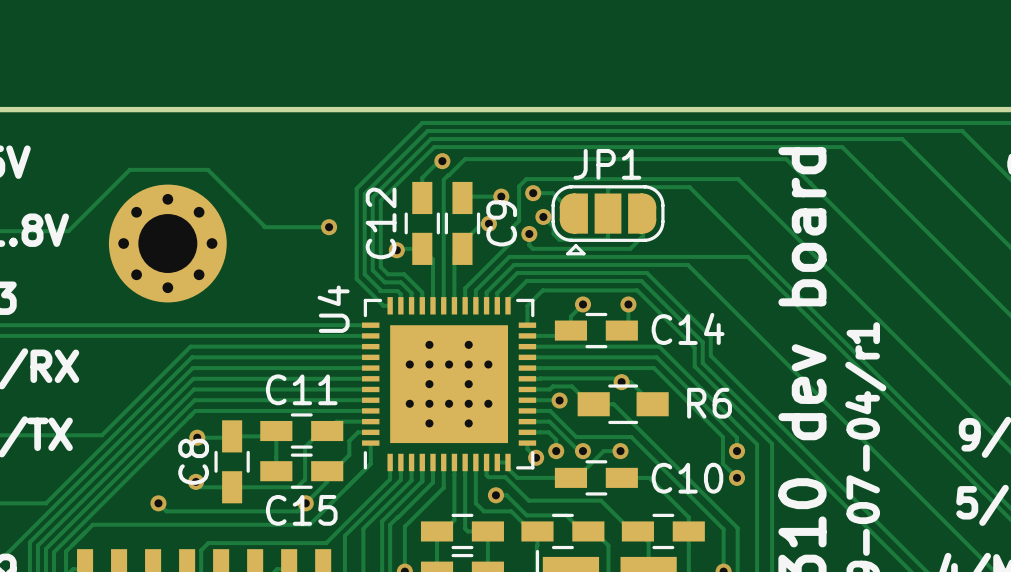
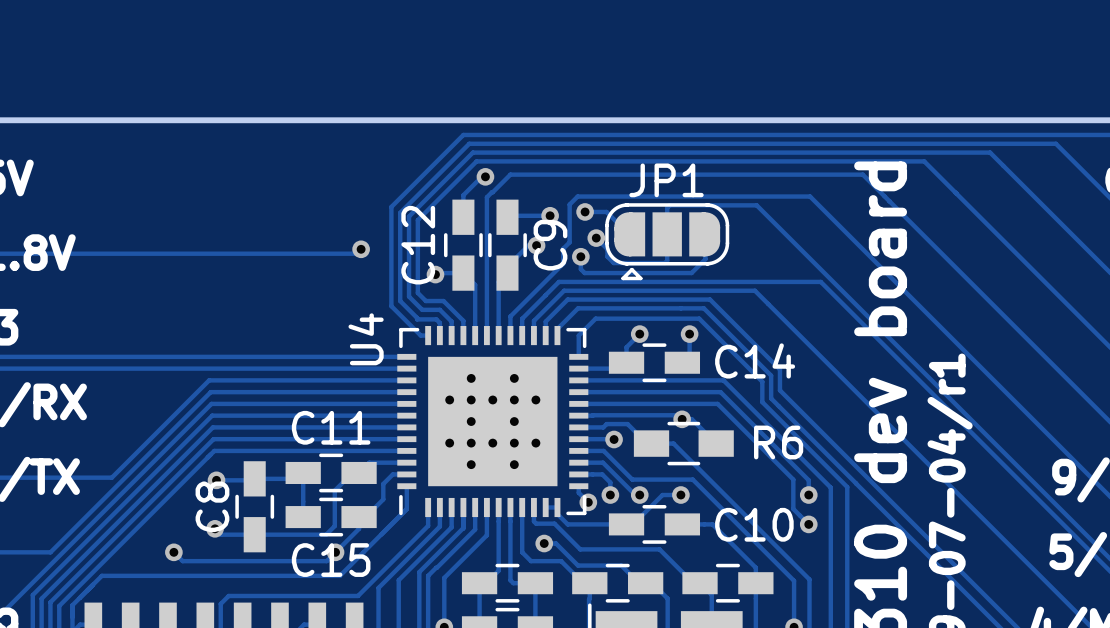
track: (329, 227) (264, 227) (208, 169) (129, 169) (68, 231) -> (361, 249) (356, 253) (75, 253)
part: (167, 243) -> none

